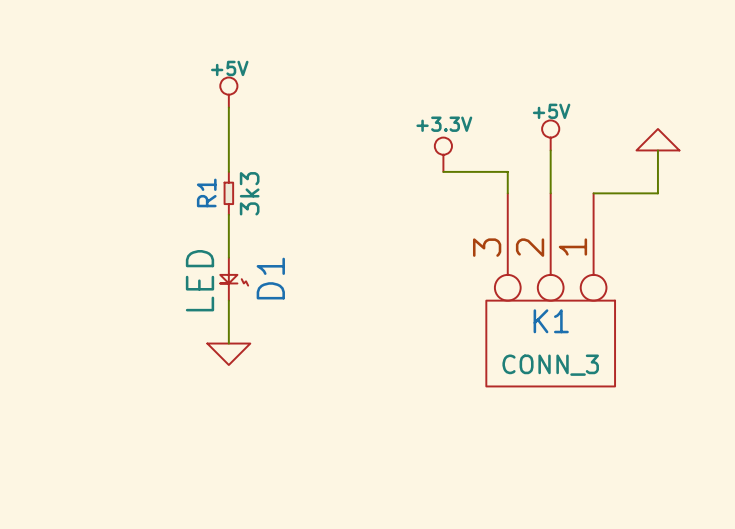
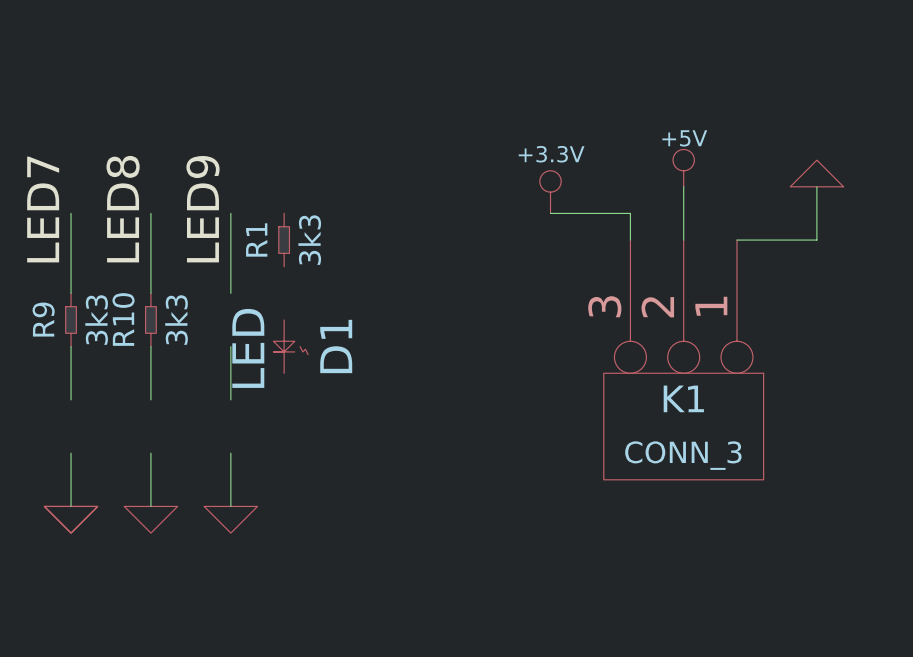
power symbol: +5V (228, 92) -> none
wire: (228, 107) (228, 171) -> (230, 213) (230, 293)
label: none -> LED7 (43, 209)
label: none -> LED8 (123, 209)
label: none -> LED9 (202, 209)
wire: none -> (71, 213) (71, 293)
wire: none -> (150, 213) (150, 293)
wire: (228, 214) (228, 257) -> (230, 346) (230, 399)
R9: none -> 3k3 (71, 319)
R10: none -> 3k3 (150, 319)
wire: none -> (71, 346) (71, 399)
wire: none -> (150, 346) (150, 399)
wire: (228, 300) (228, 343) -> (230, 453) (230, 506)
power symbol: (228, 354) -> none
wire: none -> (71, 453) (71, 506)
wire: none -> (150, 453) (150, 506)
power symbol: none -> (71, 519)
power symbol: none -> (150, 519)
power symbol: none -> (230, 519)

